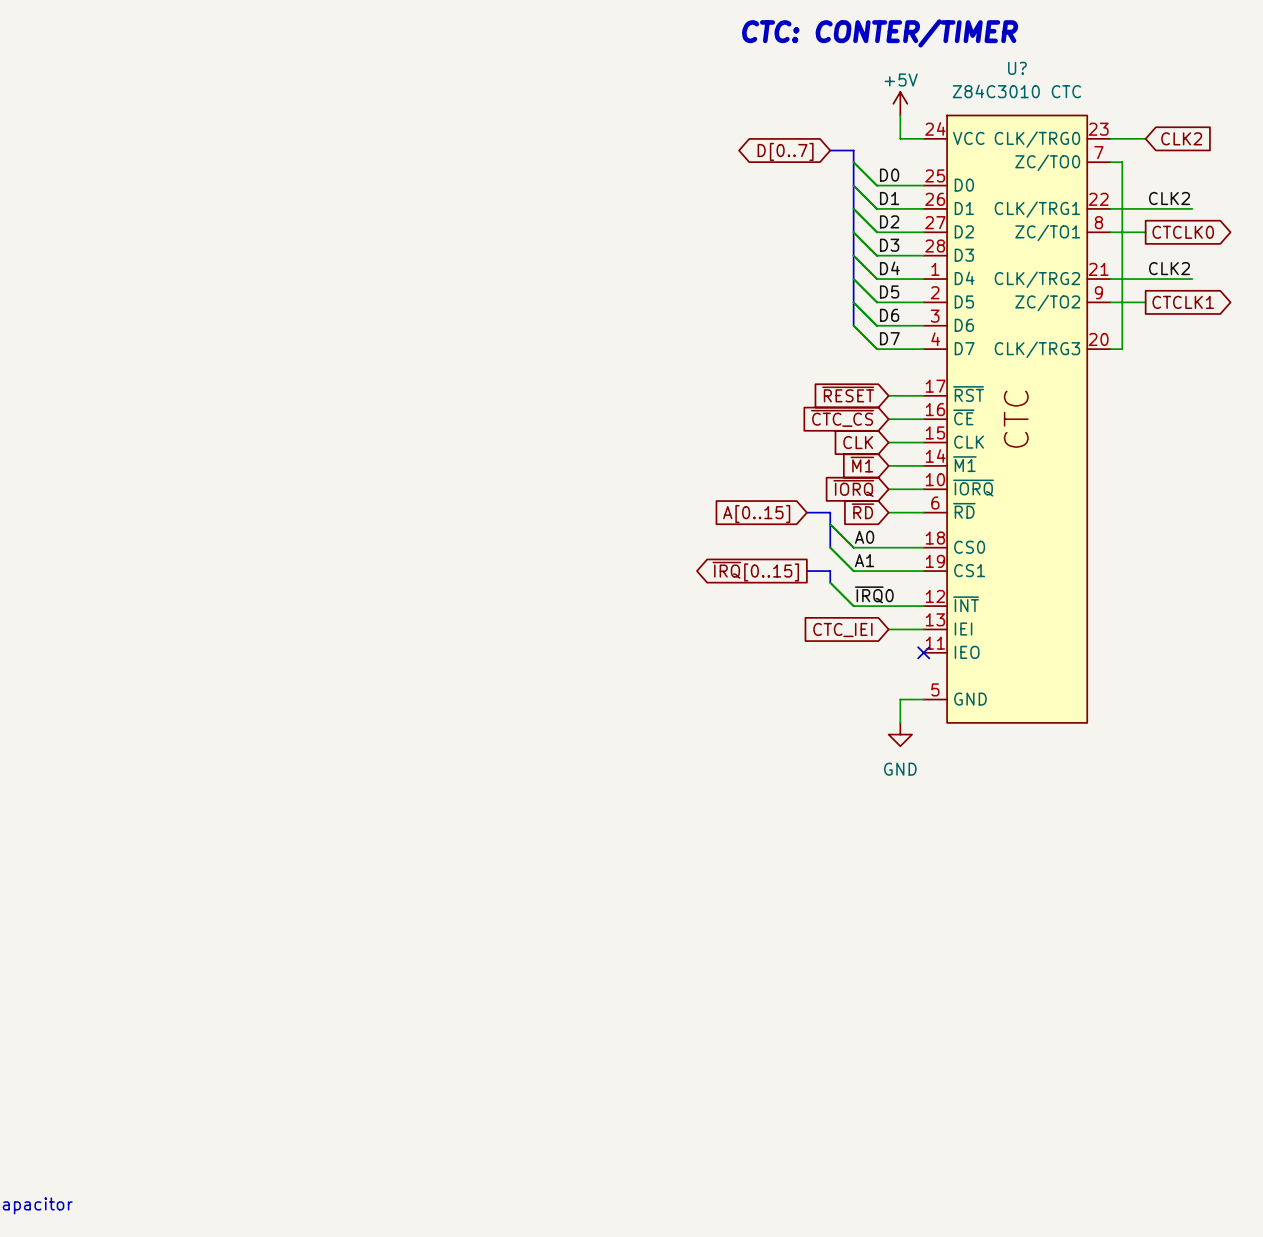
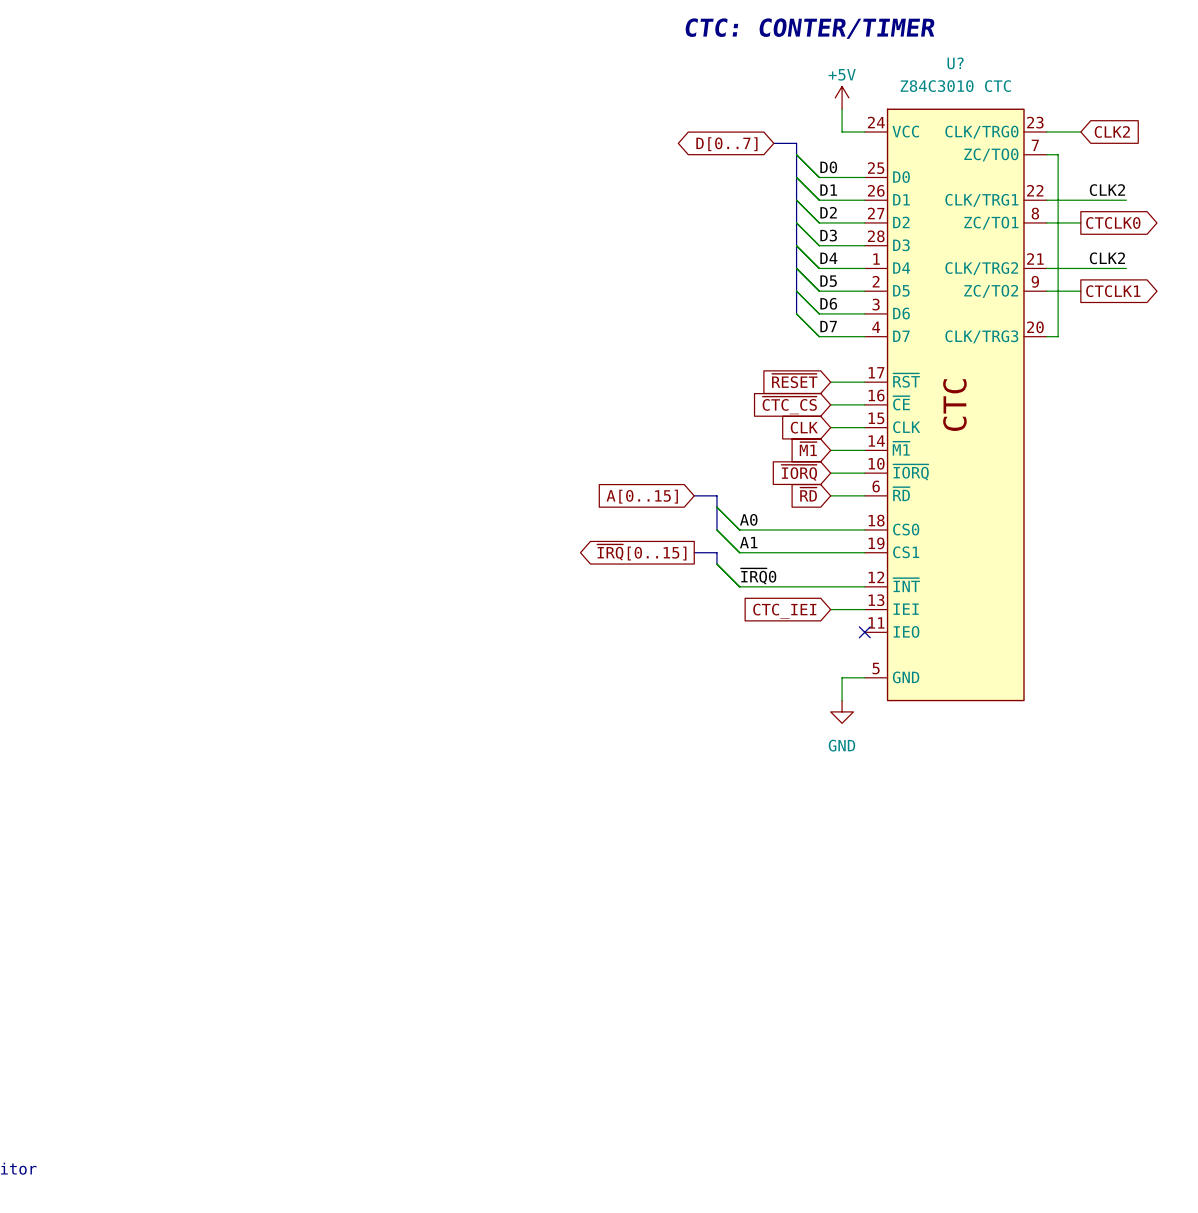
bus: (806, 512) (830, 512) (830, 547) -> (694, 495) (716, 495) (716, 529)
global label position: A[0..15] (756, 514) -> A[0..15] (642, 496)
wire: (830, 524) (853, 547) -> (716, 507) (739, 529) (796, 529)
label position: A0 (864, 537) -> A0 (748, 519)
wire: (830, 547) (853, 571) -> (716, 529) (739, 552) (796, 552)
label position: A1 (864, 560) -> A1 (748, 542)
global label position: ~{IRQ}[0..15] (755, 571) -> ~{IRQ}[0..15] (641, 552)
bus: (806, 571) (830, 571) (830, 582) -> (694, 552) (716, 552) (716, 564)
wire: (830, 582) (853, 606) -> (716, 564) (739, 586) (796, 586)
label position: ~{IRQ}0 (874, 594) -> ~{IRQ}0 (758, 576)

